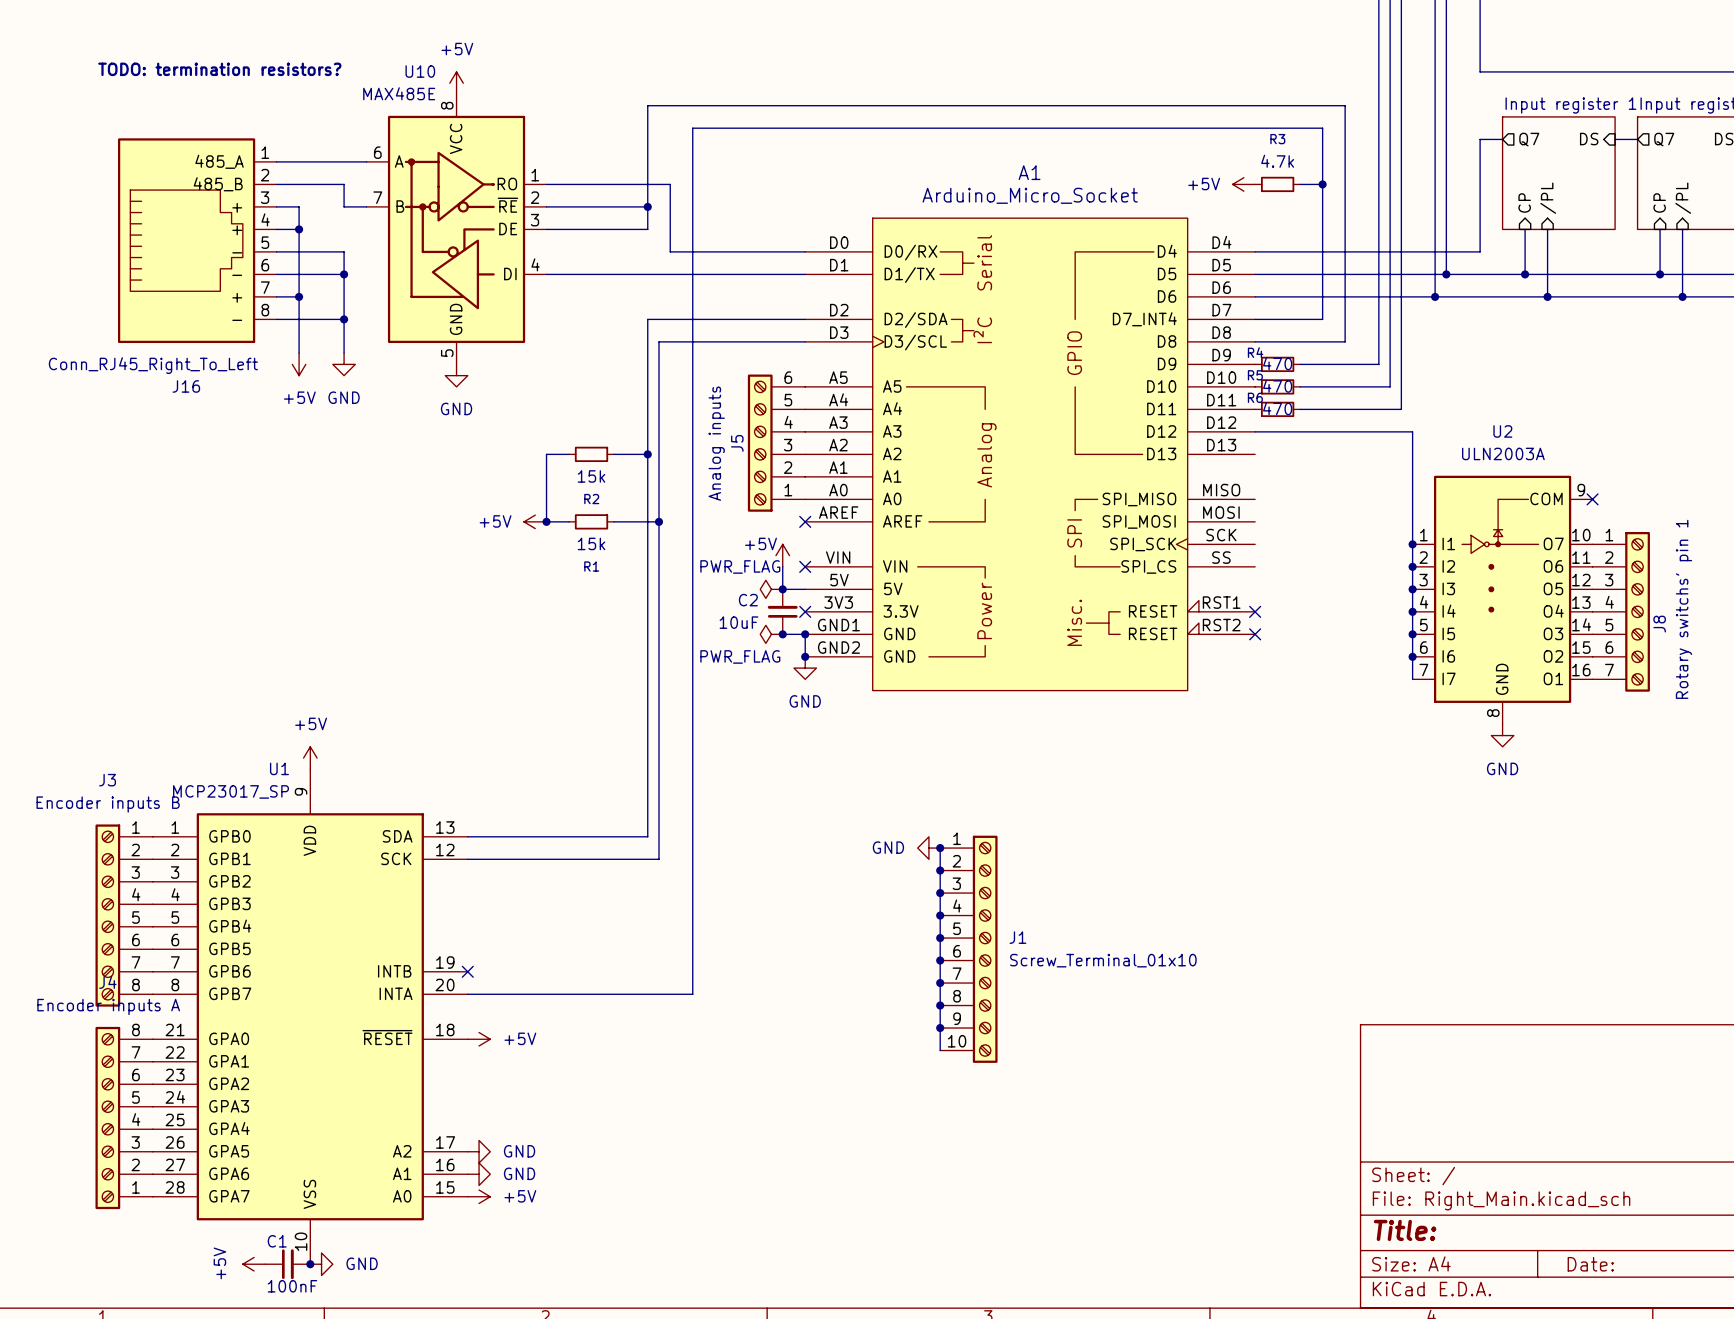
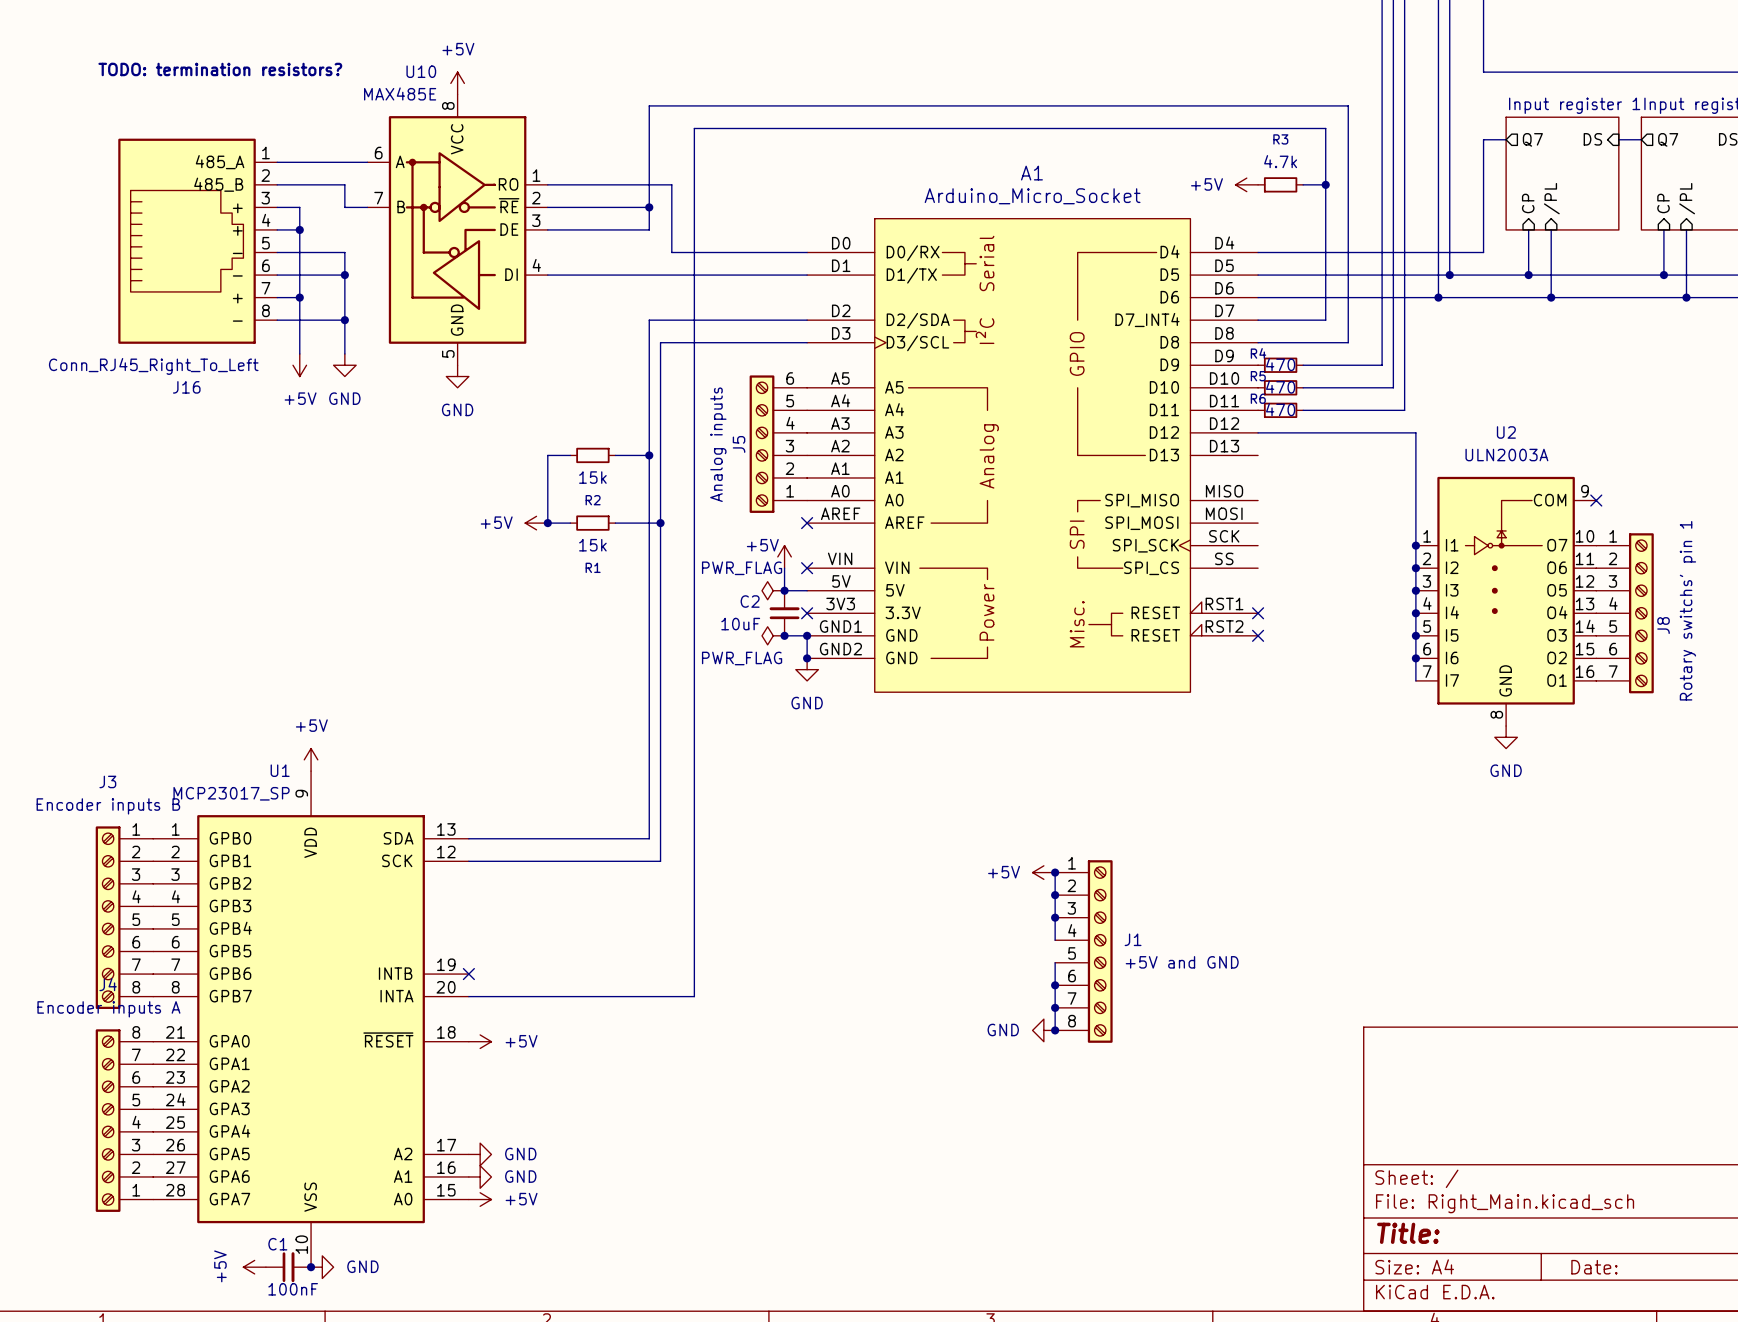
J1 symbol: [940, 835, 998, 1063] -> [1055, 860, 1113, 1043]
power symbol position: GND (928, 848) -> GND (1043, 1030)
wire: (940, 848) (940, 1050) -> none
junction: (940, 848) -> none
junction: (940, 870) -> none
power symbol: none -> +5V (1043, 872)
wire: none -> (1055, 872) (1055, 940)
junction: none -> (1055, 872)
junction: (940, 893) -> none
junction: none -> (1055, 895)
junction: (940, 915) -> none
junction: none -> (1055, 917)
junction: (940, 938) -> none
junction: (940, 960) -> none
wire: none -> (1055, 962) (1055, 1030)
J1 value: Screw_Terminal_01x10 (1103, 960) -> +5V and GND (1182, 962)
junction: (940, 983) -> none
junction: none -> (1055, 985)
junction: (940, 1005) -> none
junction: none -> (1055, 1007)
junction: (940, 1028) -> none
junction: none -> (1055, 1030)

